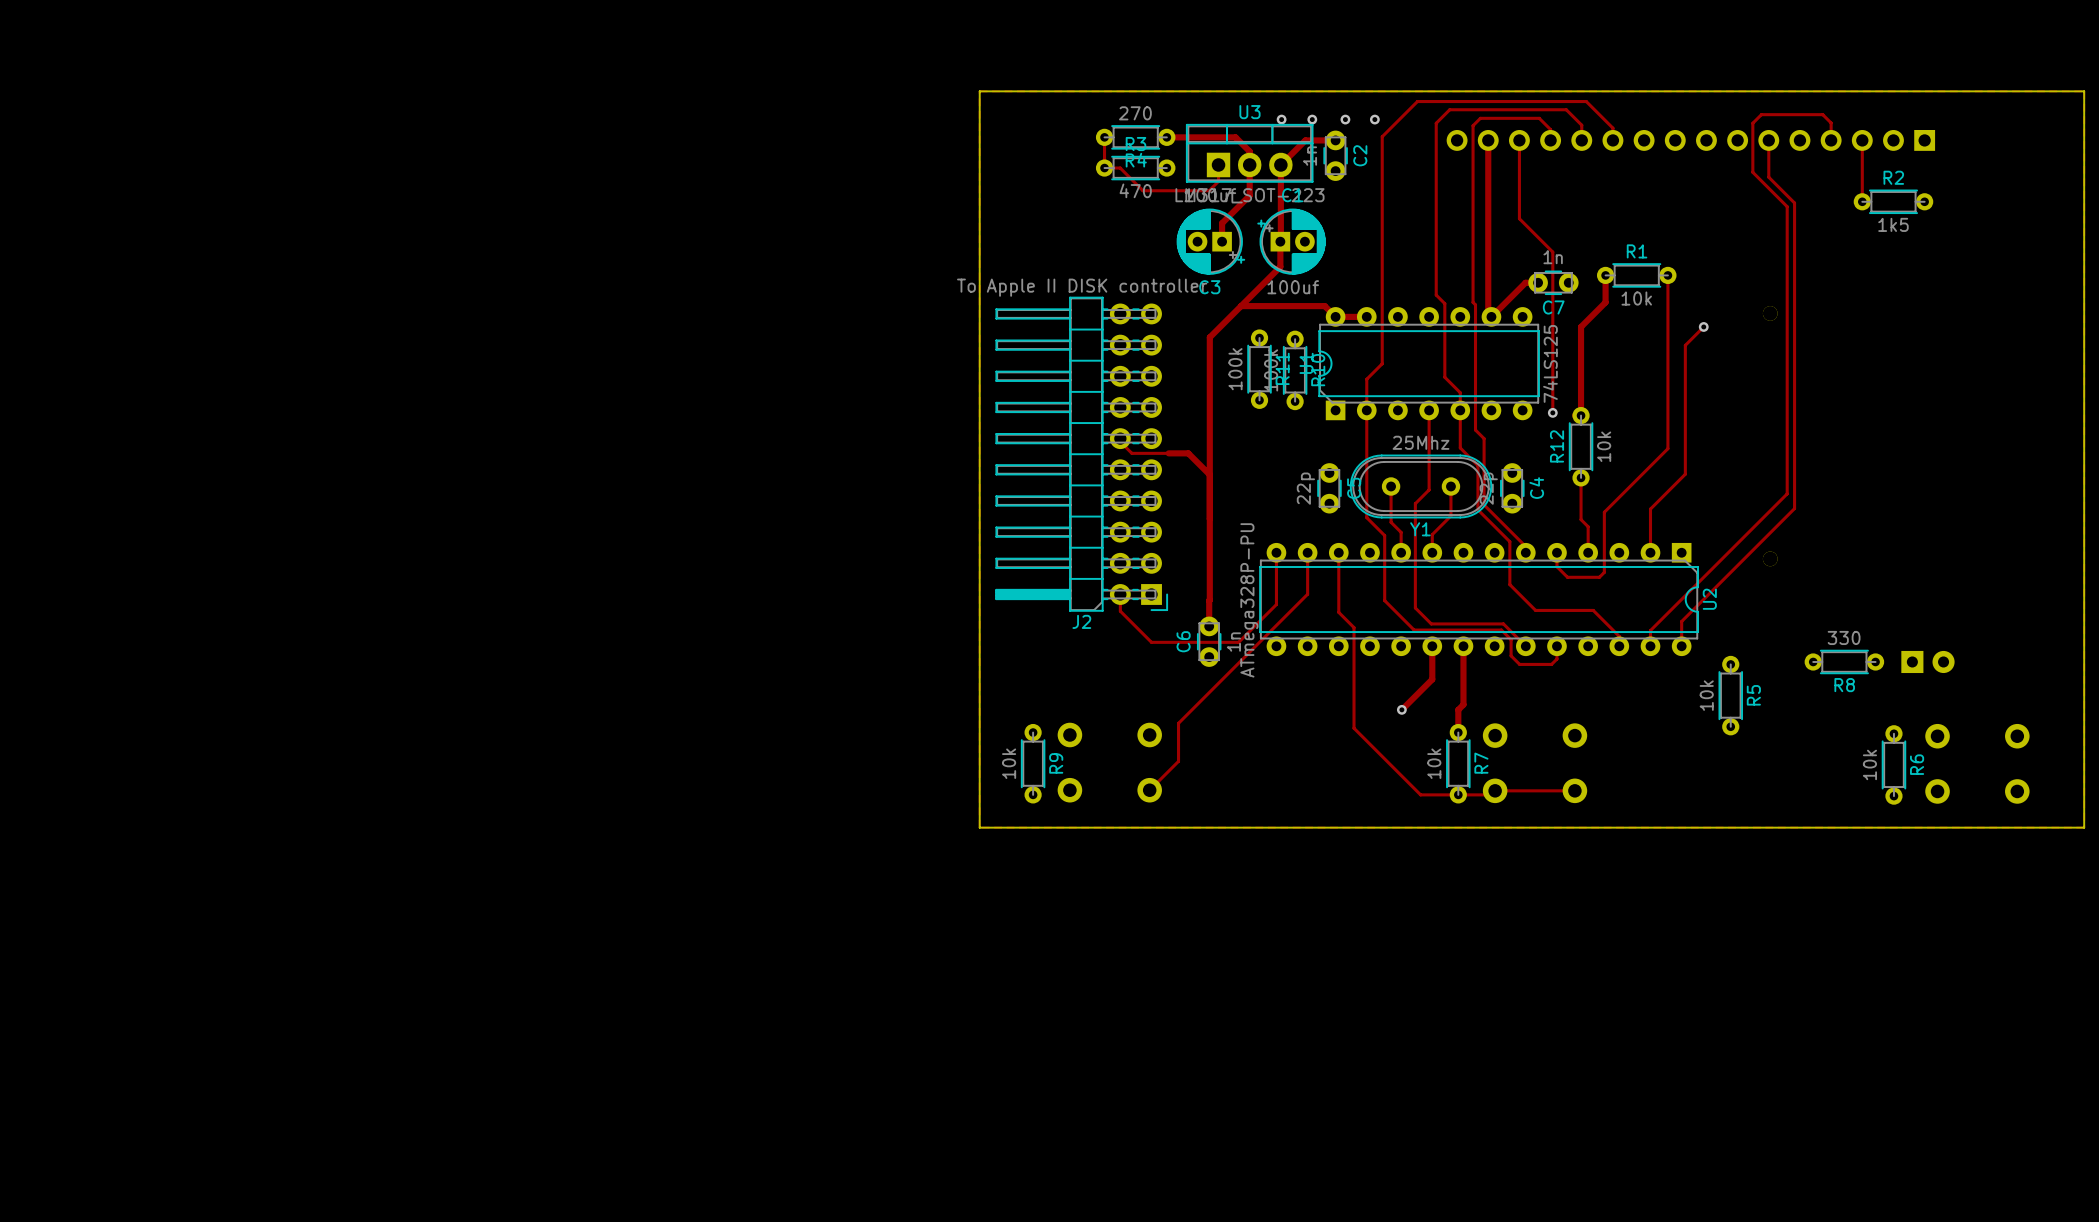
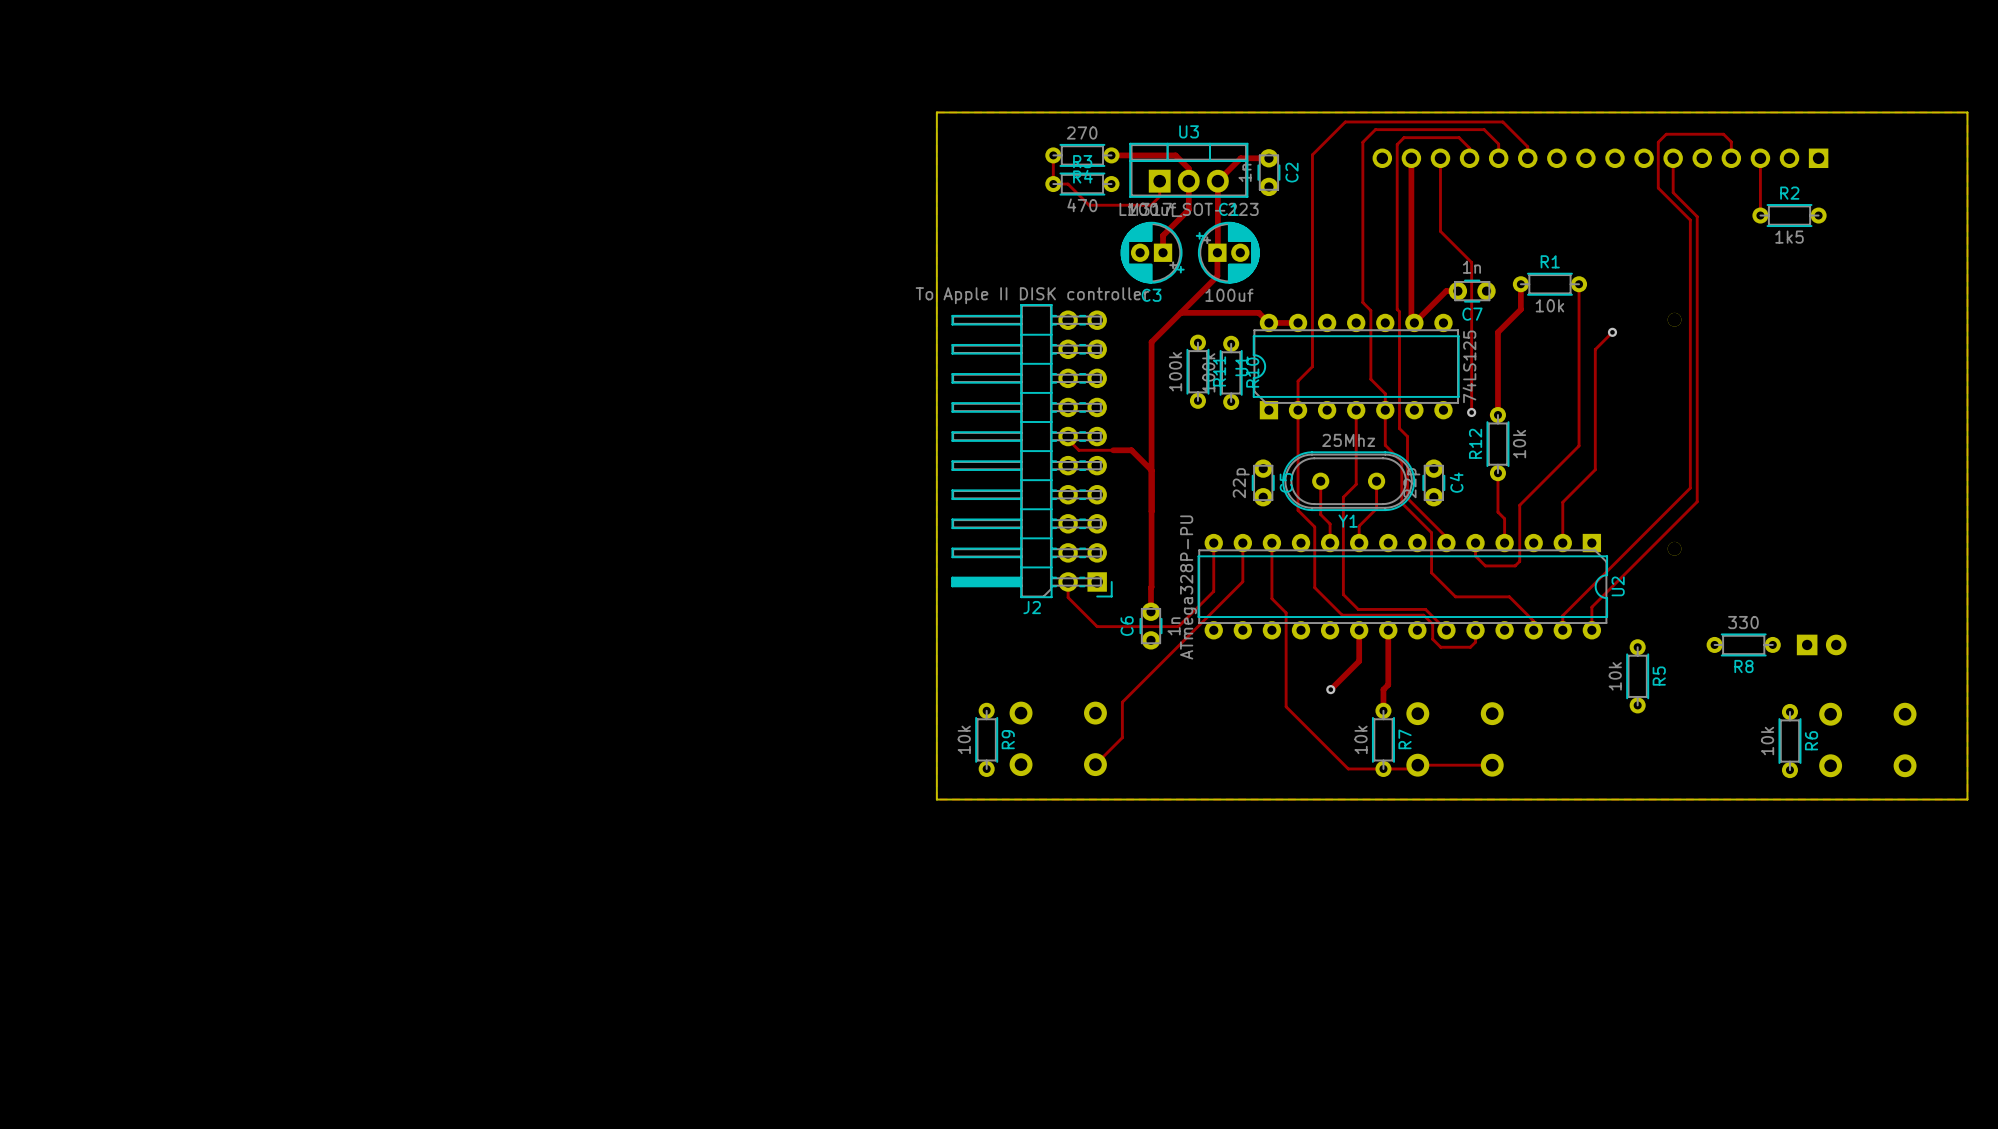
via: (1281, 119) -> none
via: (1312, 119) -> none
via: (1345, 119) -> none
via: (1374, 119) -> none

